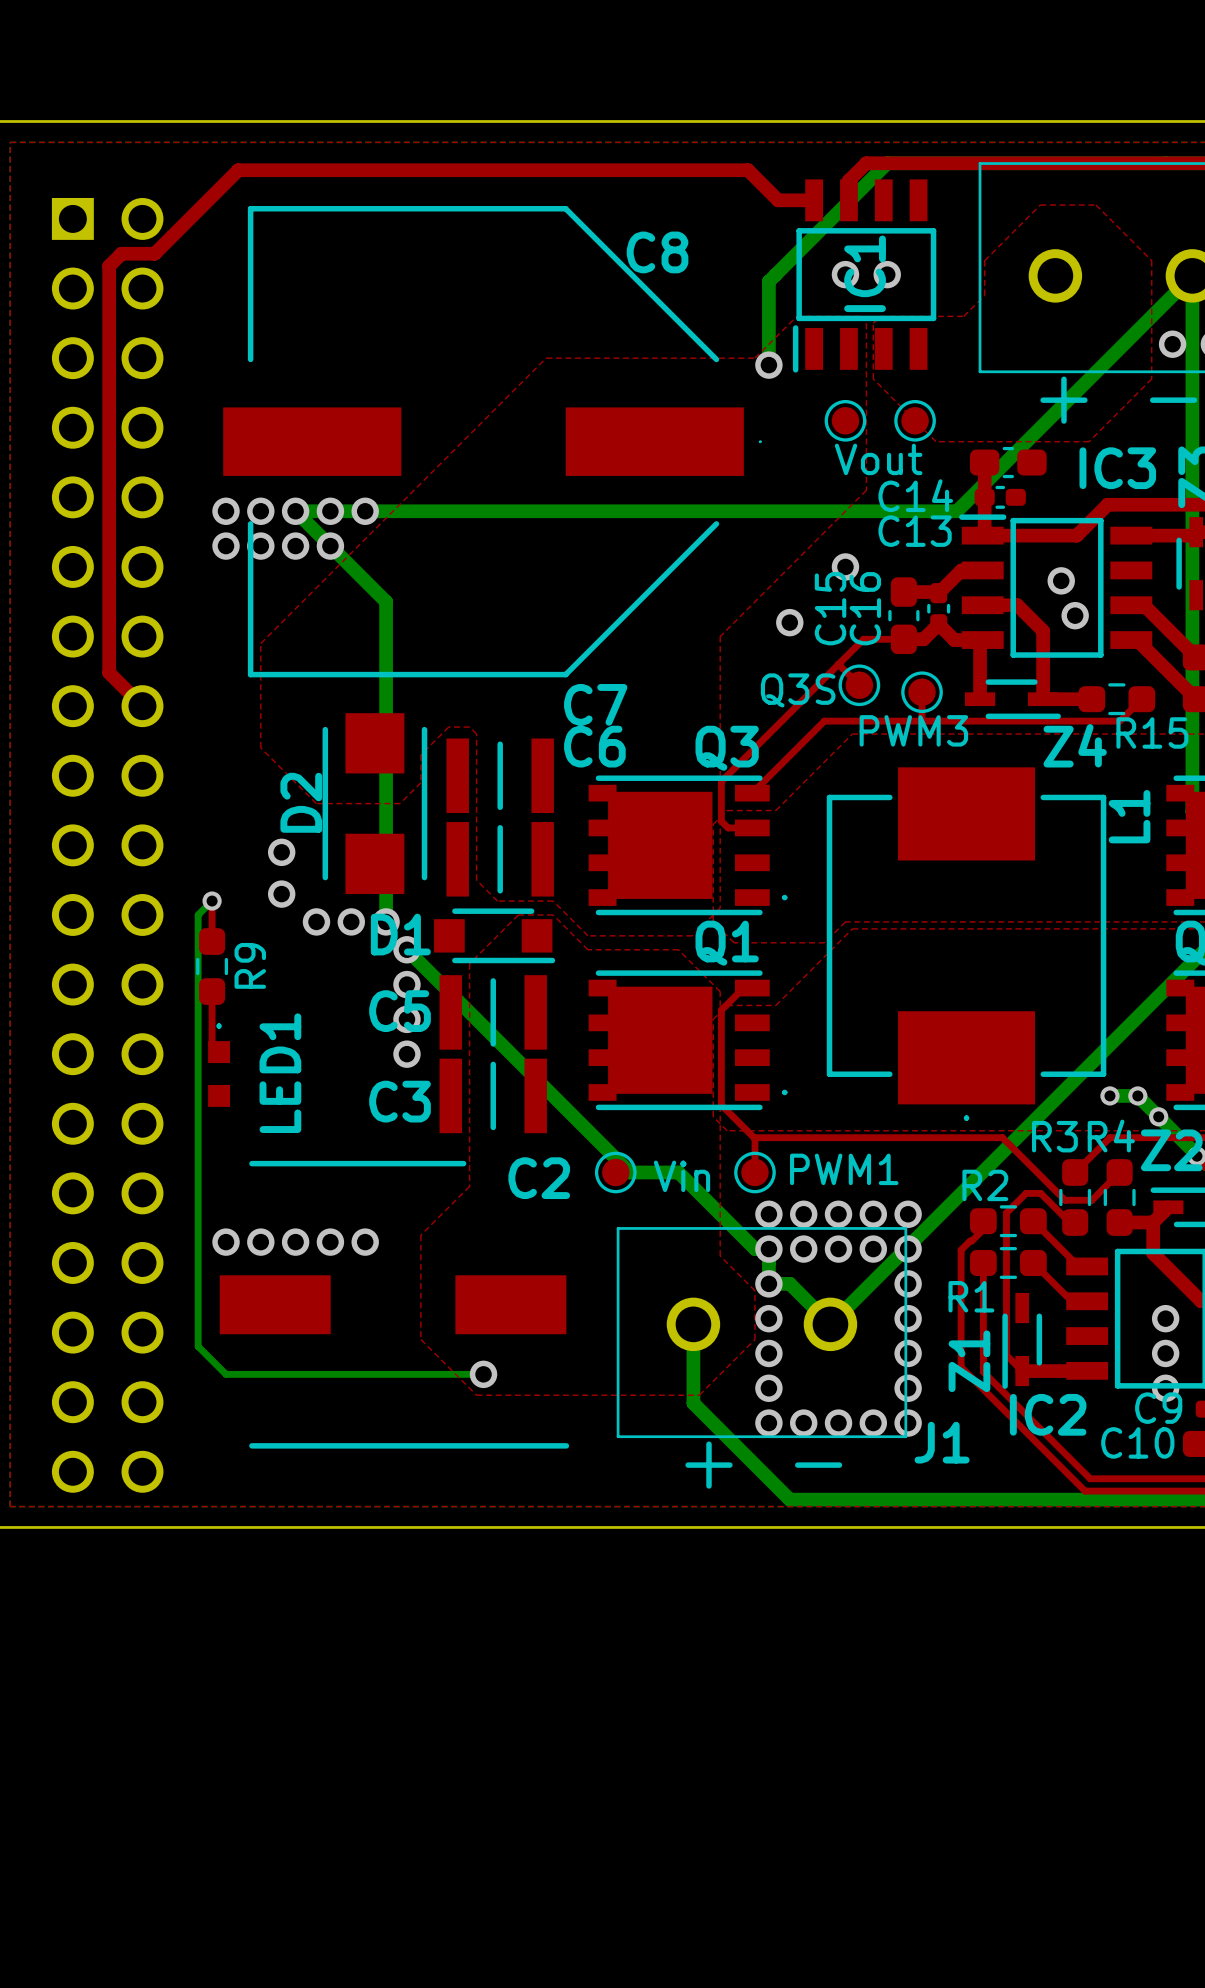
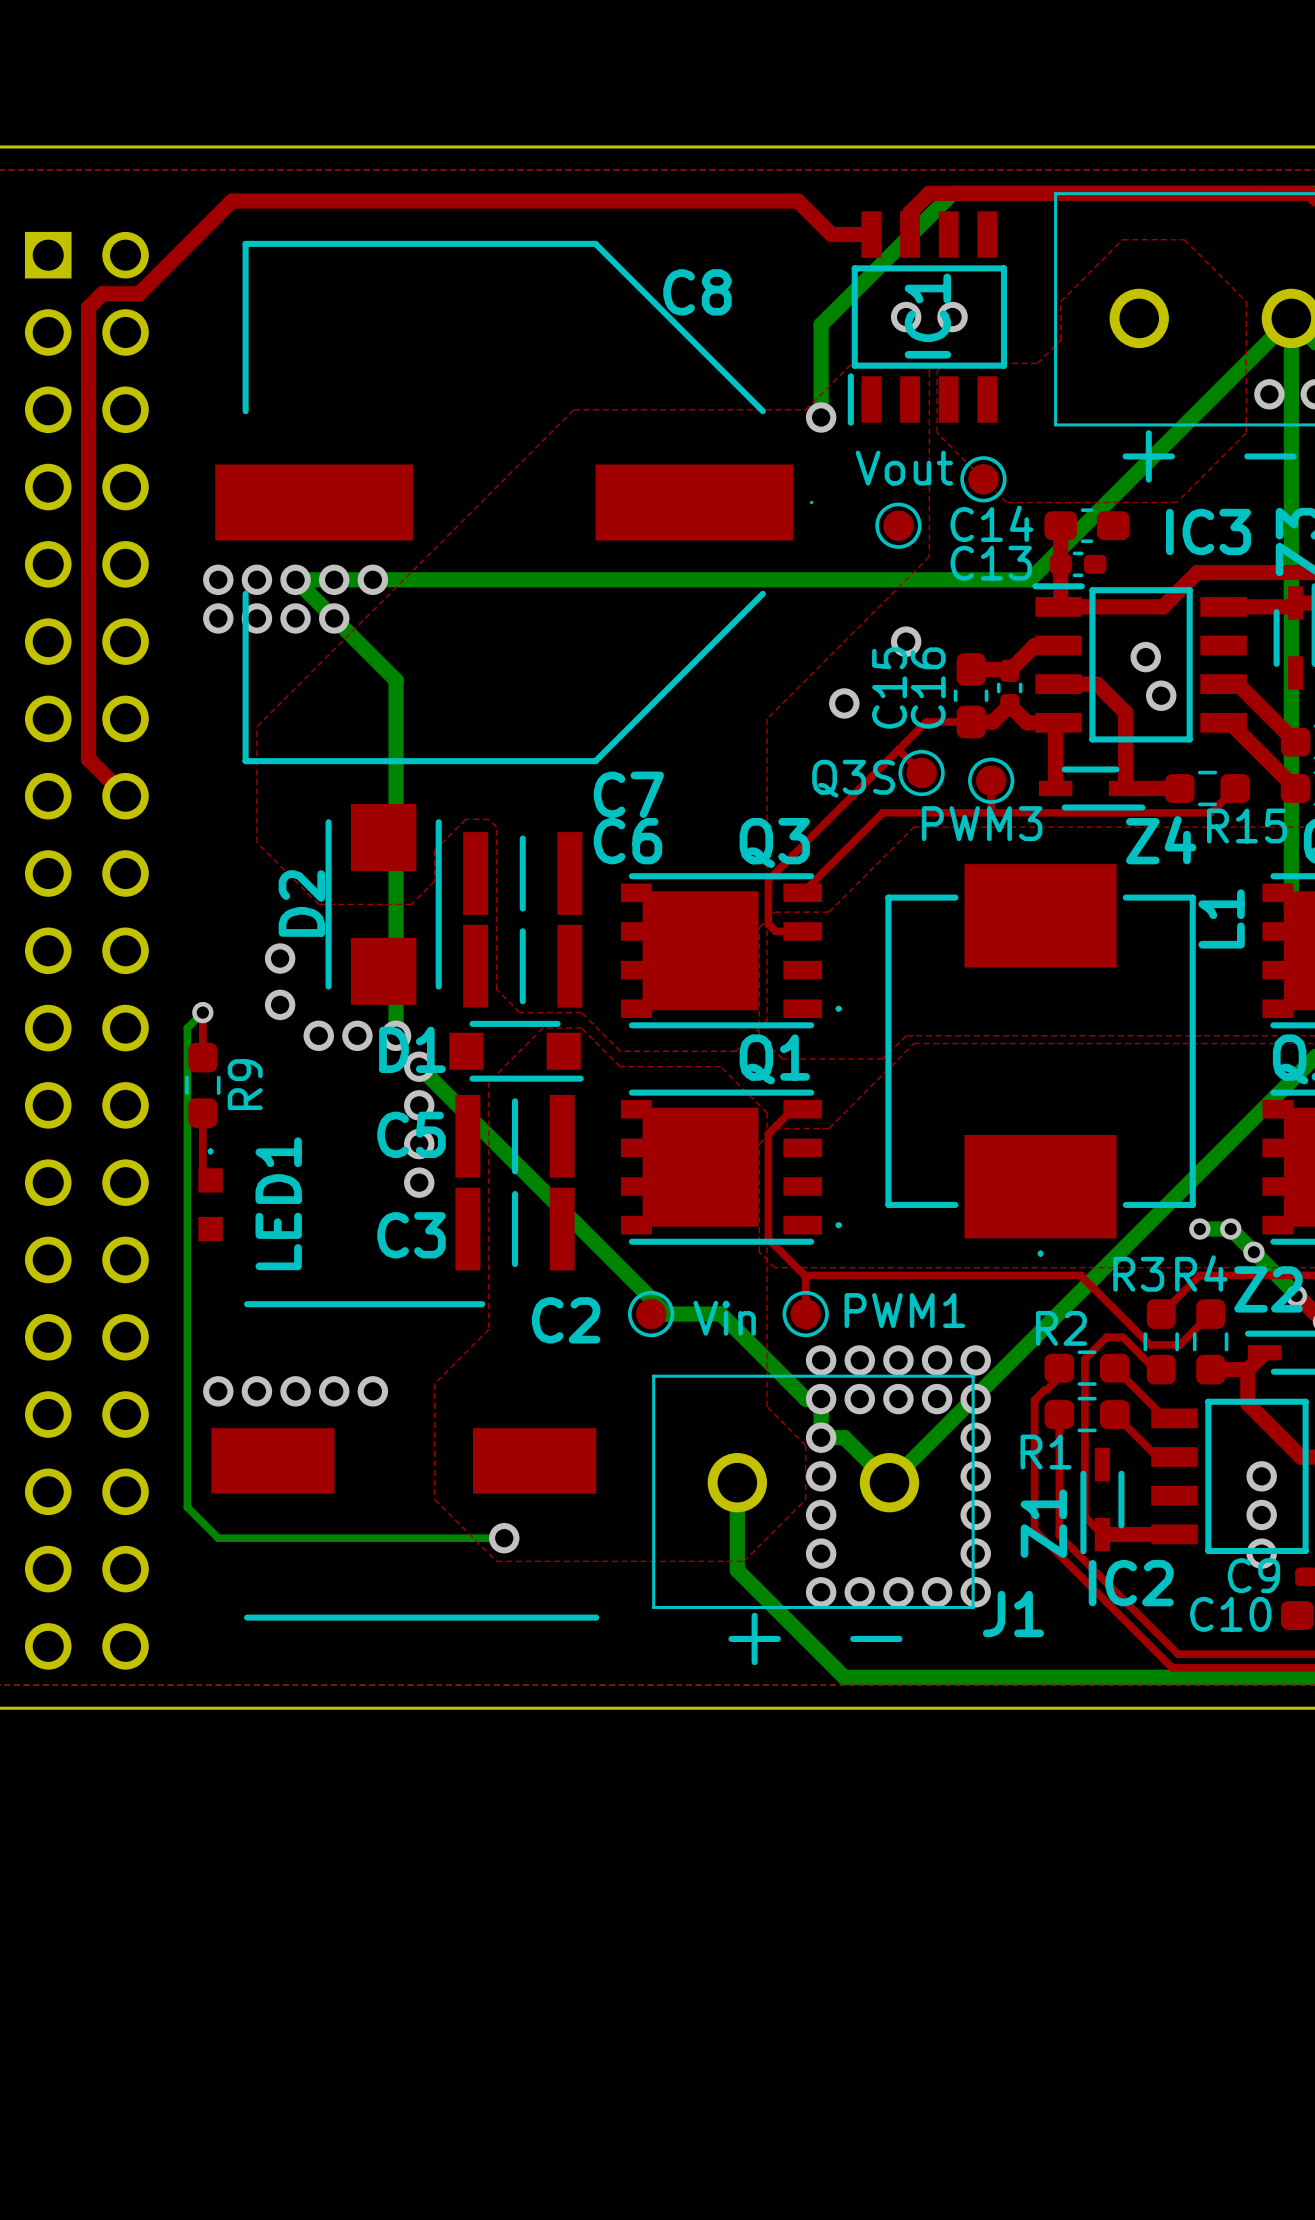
part position: (845, 420) -> (898, 525)
text position: Vout (878, 459) -> Vout (904, 468)
C14 name position: C14 (915, 495) -> C14 (991, 523)
C13 name position: C13 (915, 531) -> C13 (991, 563)

